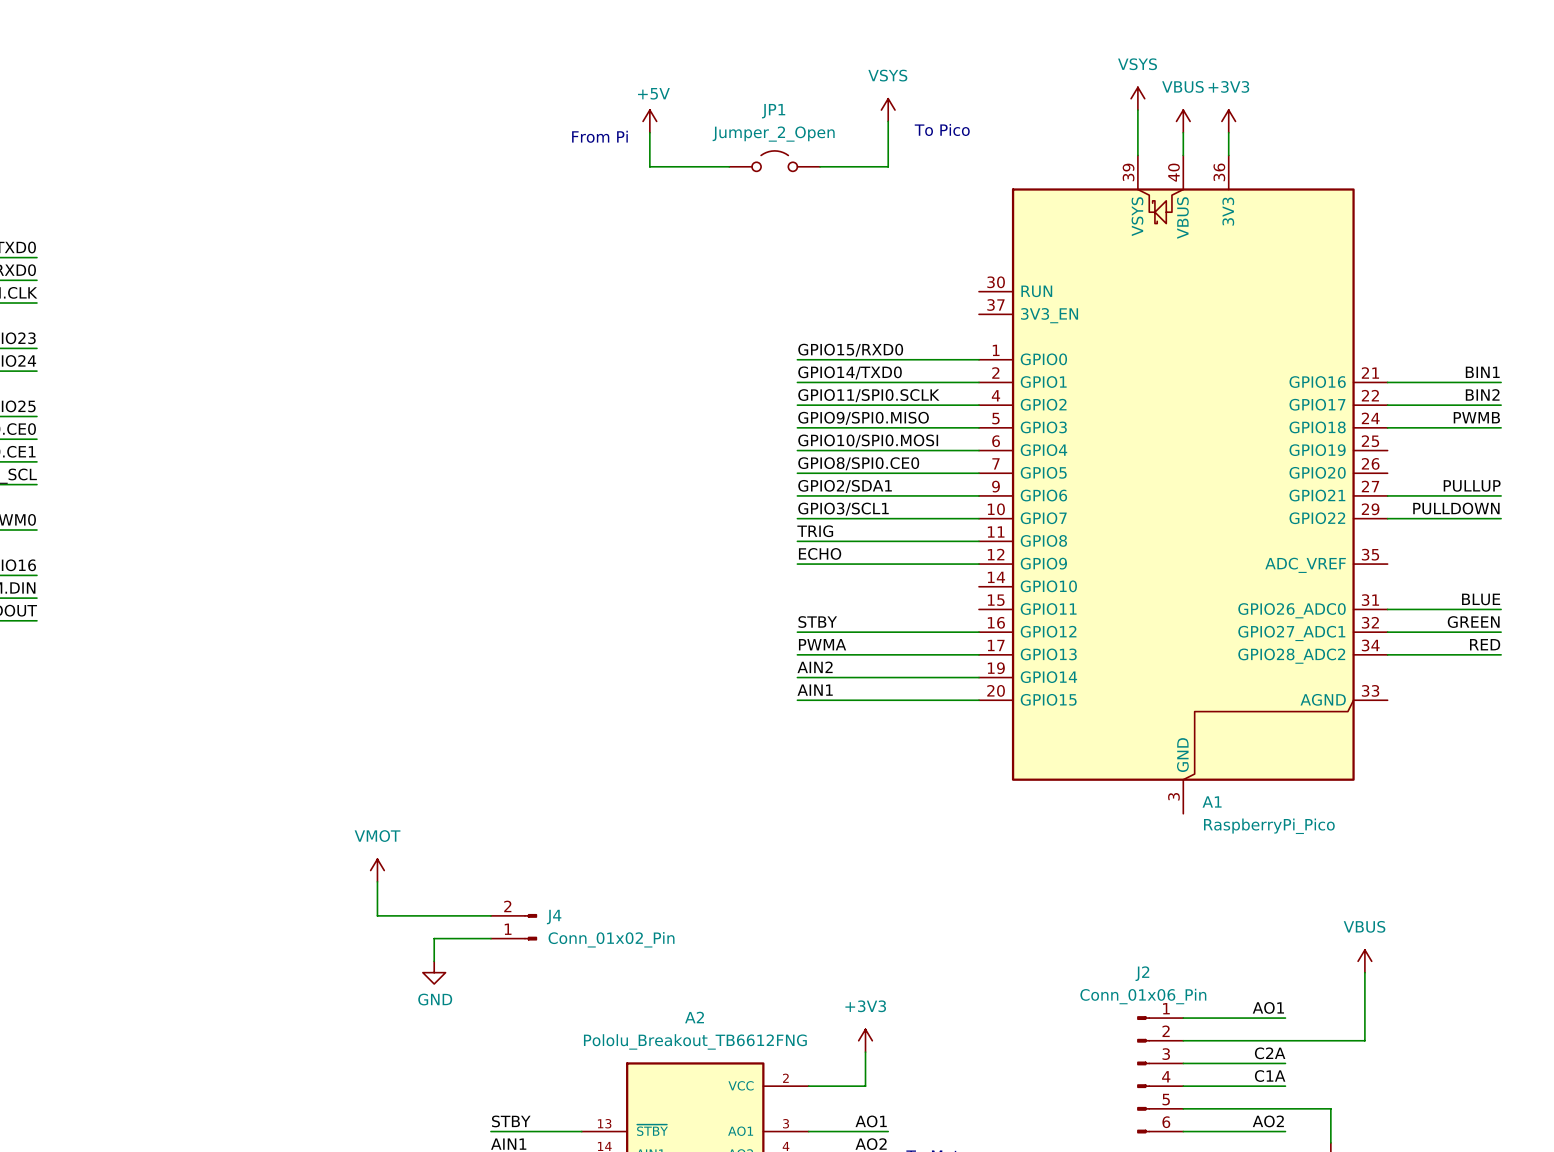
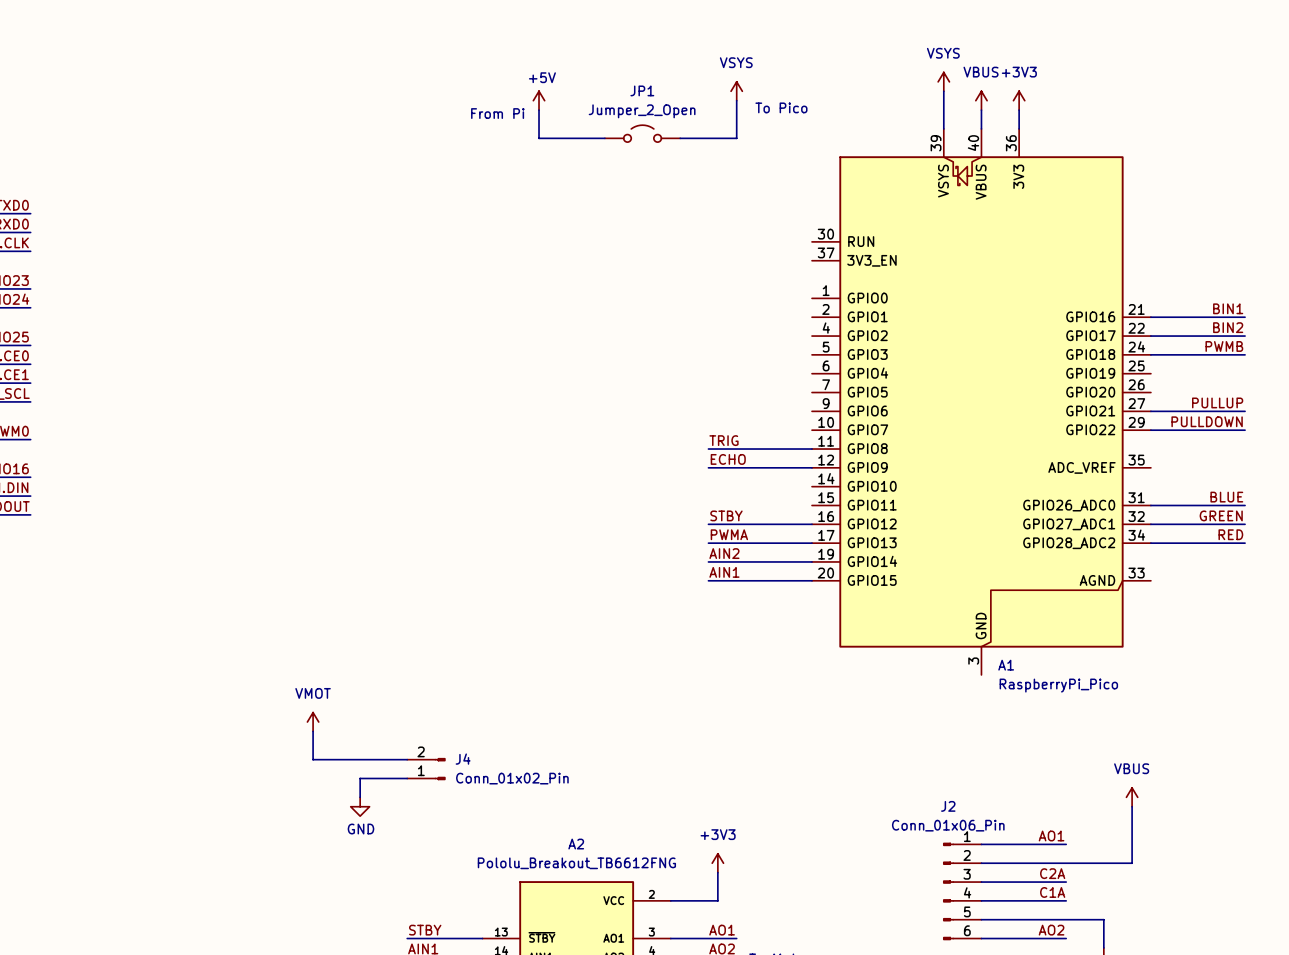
label: GPIO15/RXD0 (850, 350) -> none
wire: (797, 359) (979, 359) -> none
label: GPIO14/TXD0 (850, 372) -> none
wire: (797, 382) (979, 382) -> none
label: GPIO11/SPI0.SCLK (868, 395) -> none
wire: (797, 405) (979, 405) -> none
label: GPIO9/SPI0.MISO (863, 418) -> none
wire: (797, 427) (979, 427) -> none
label: GPIO10/SPI0.MOSI (868, 441) -> none
wire: (797, 450) (979, 450) -> none
label: GPIO8/SPI0.CE0 (858, 463) -> none
wire: (797, 473) (979, 473) -> none
label: GPIO2/SDA1 (845, 486) -> none
wire: (797, 495) (979, 495) -> none
label: GPIO3/SCL1 (843, 509) -> none
wire: (797, 518) (979, 518) -> none
label position: TRIG (815, 531) -> TRIG (723, 440)
wire: (797, 541) (854, 541) -> none
label position: ECHO (820, 553) -> ECHO (728, 459)
wire: (797, 564) (854, 564) -> none
label position: STBY (817, 622) -> STBY (726, 515)
wire: (797, 632) (854, 632) -> none
label position: PWMA (822, 644) -> PWMA (729, 534)
wire: (797, 654) (854, 654) -> none
label position: AIN2 (815, 667) -> AIN2 (724, 553)
wire: (797, 677) (854, 677) -> none
label position: AIN1 (815, 690) -> AIN1 (724, 572)
wire: (797, 700) (854, 700) -> none

